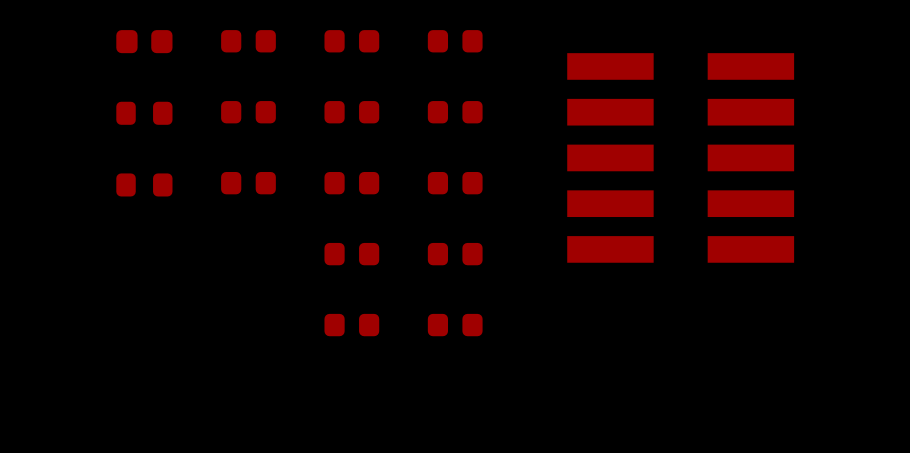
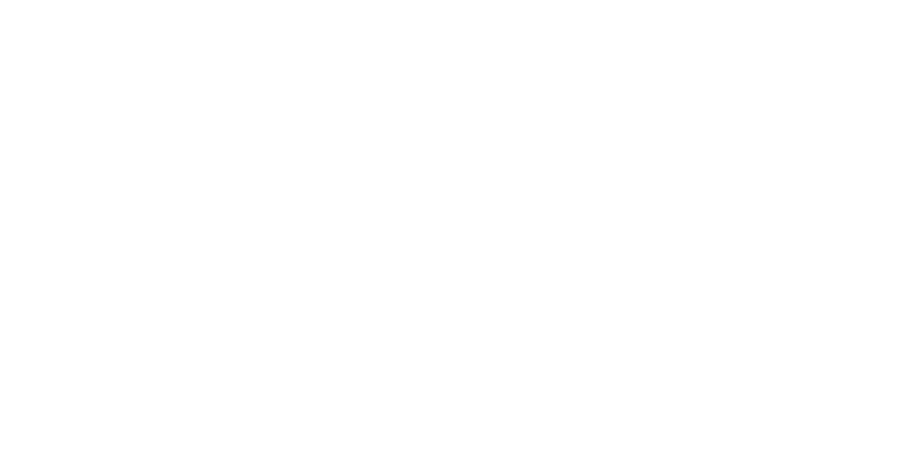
part: (144, 41) -> none
part: (248, 41) -> none
part: (351, 41) -> none
part: (455, 41) -> none
part: (248, 112) -> none
part: (351, 112) -> none
part: (455, 112) -> none
part: (144, 113) -> none
part: (680, 157) -> none
part: (248, 183) -> none
part: (351, 183) -> none
part: (455, 183) -> none
part: (144, 184) -> none
part: (351, 254) -> none
part: (455, 254) -> none
part: (351, 325) -> none
part: (455, 325) -> none

